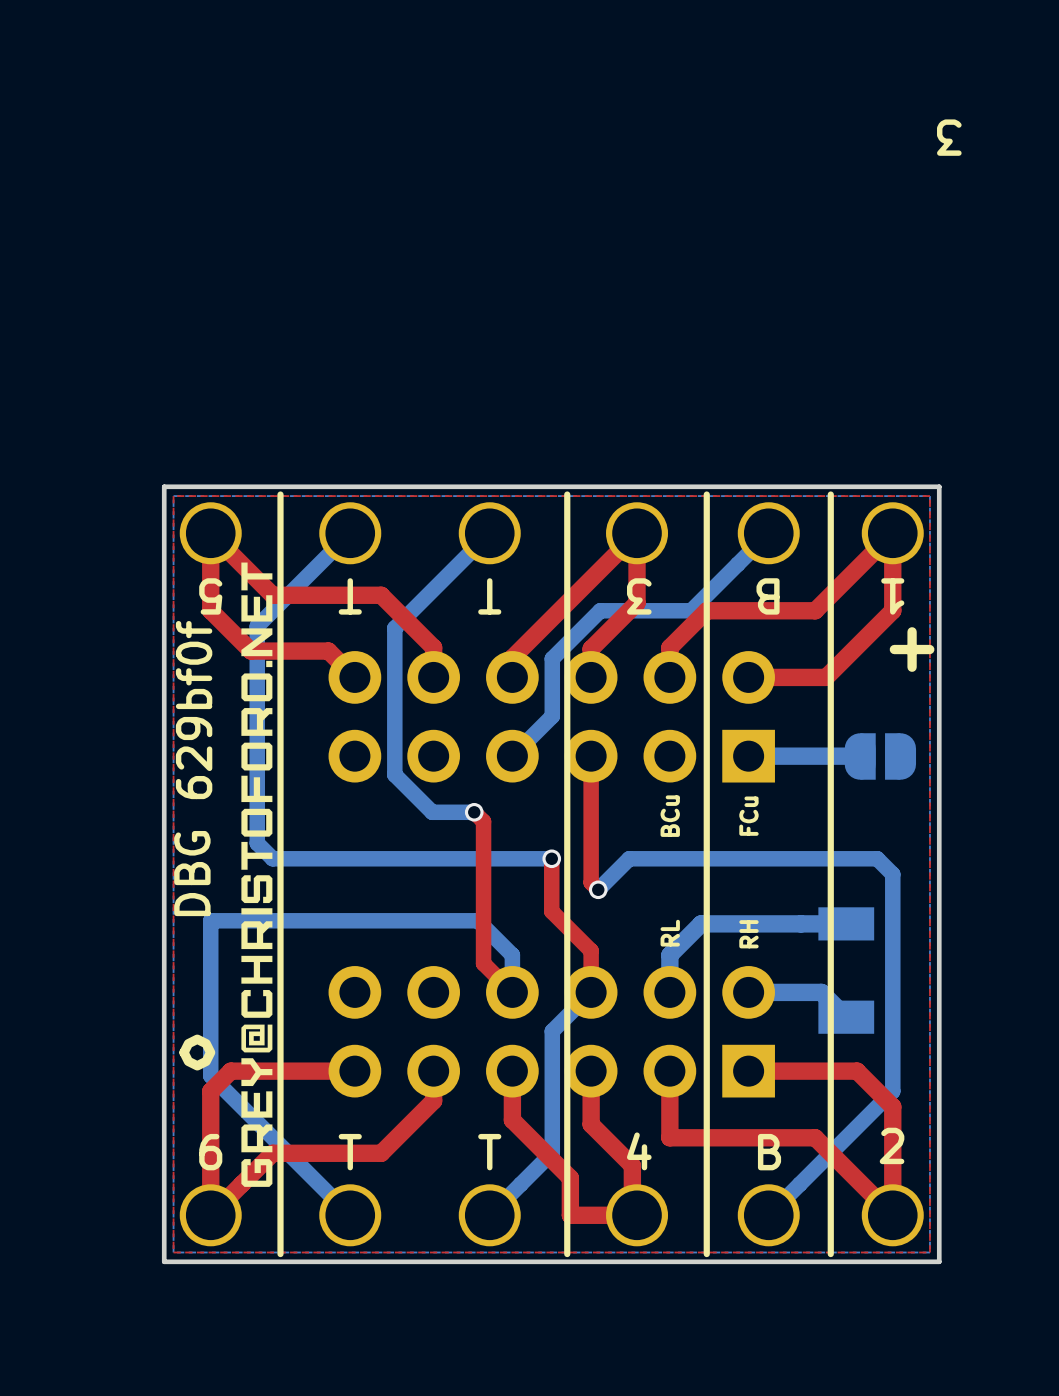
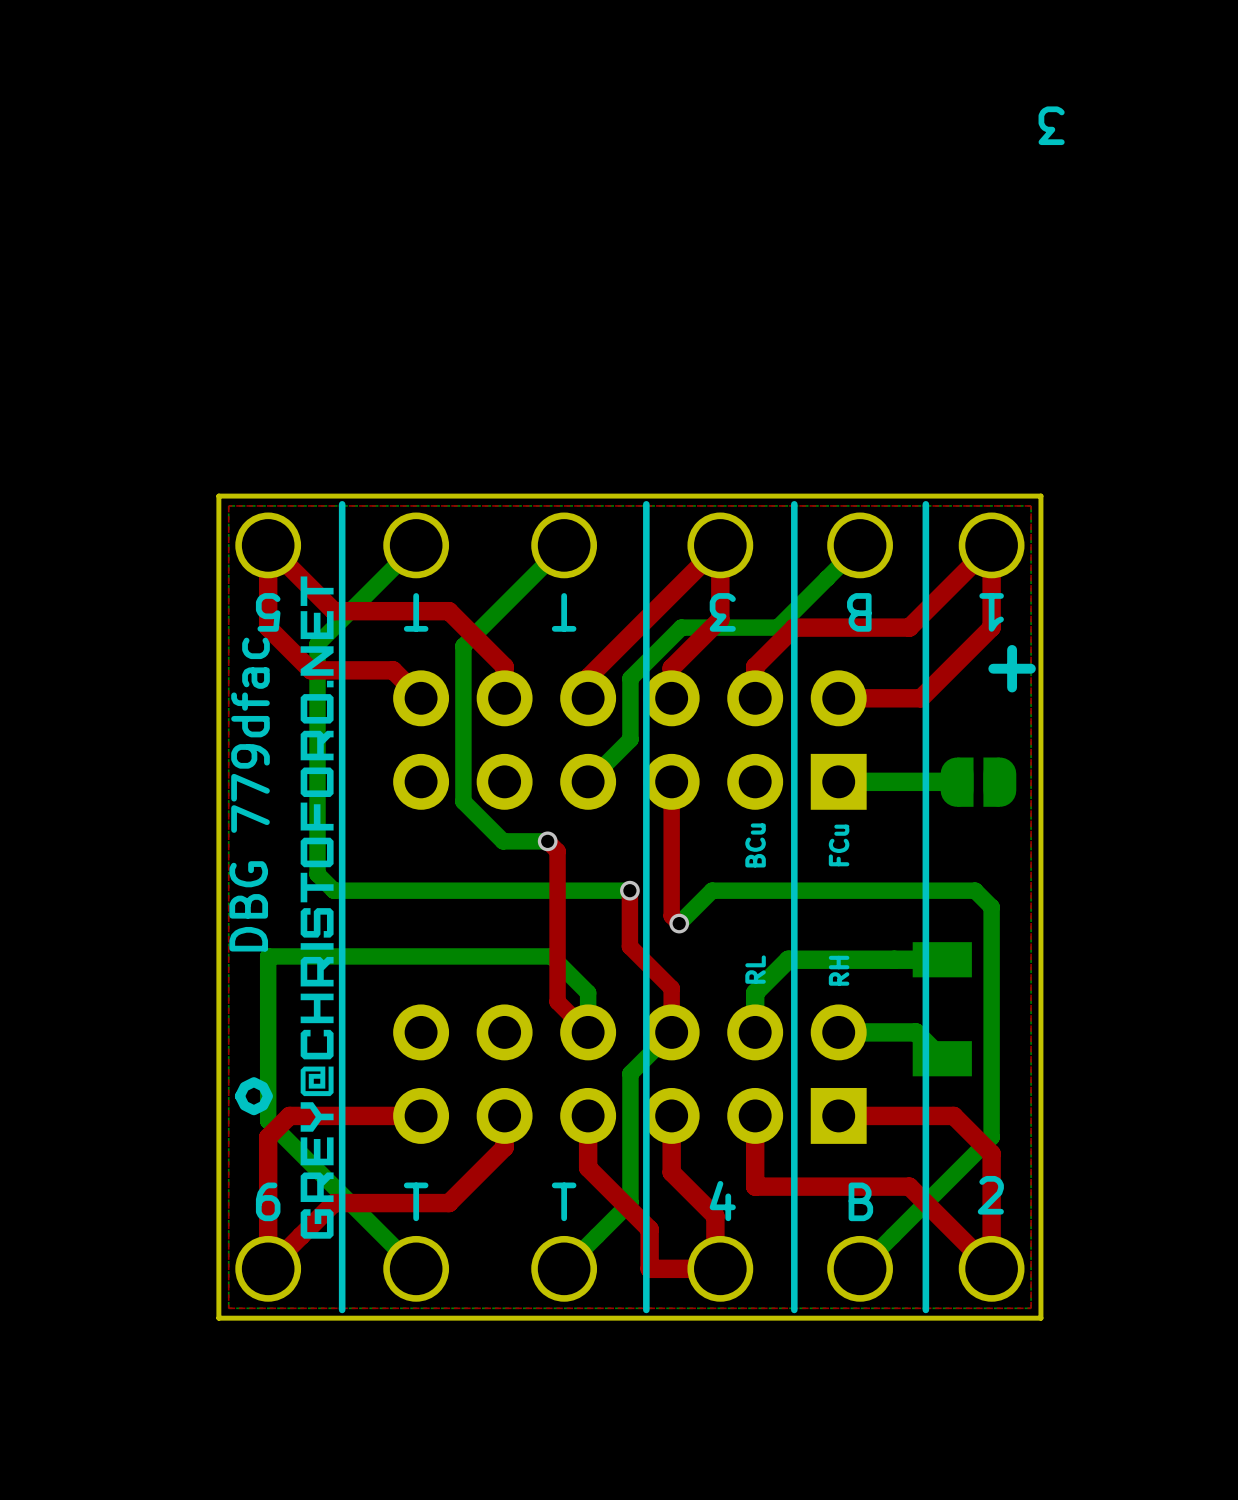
text: 629bf0f (194, 710) -> 779dfac (250, 735)

